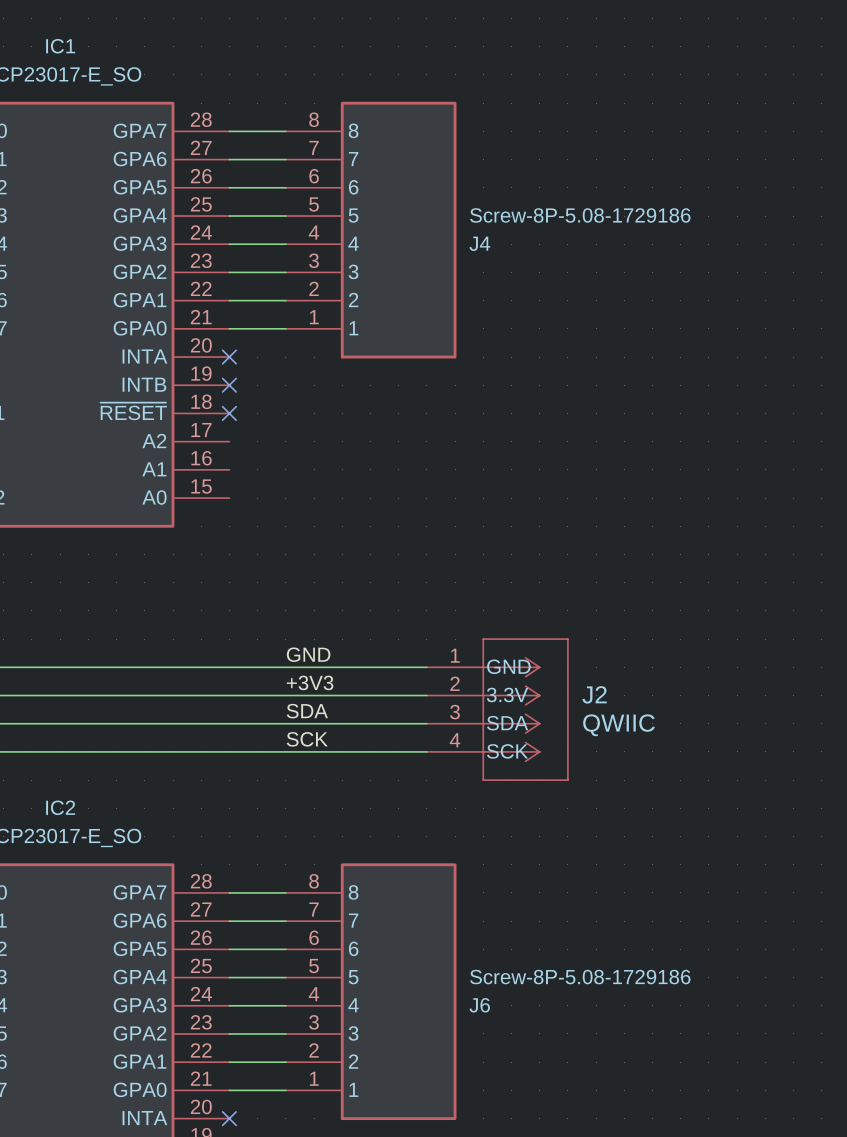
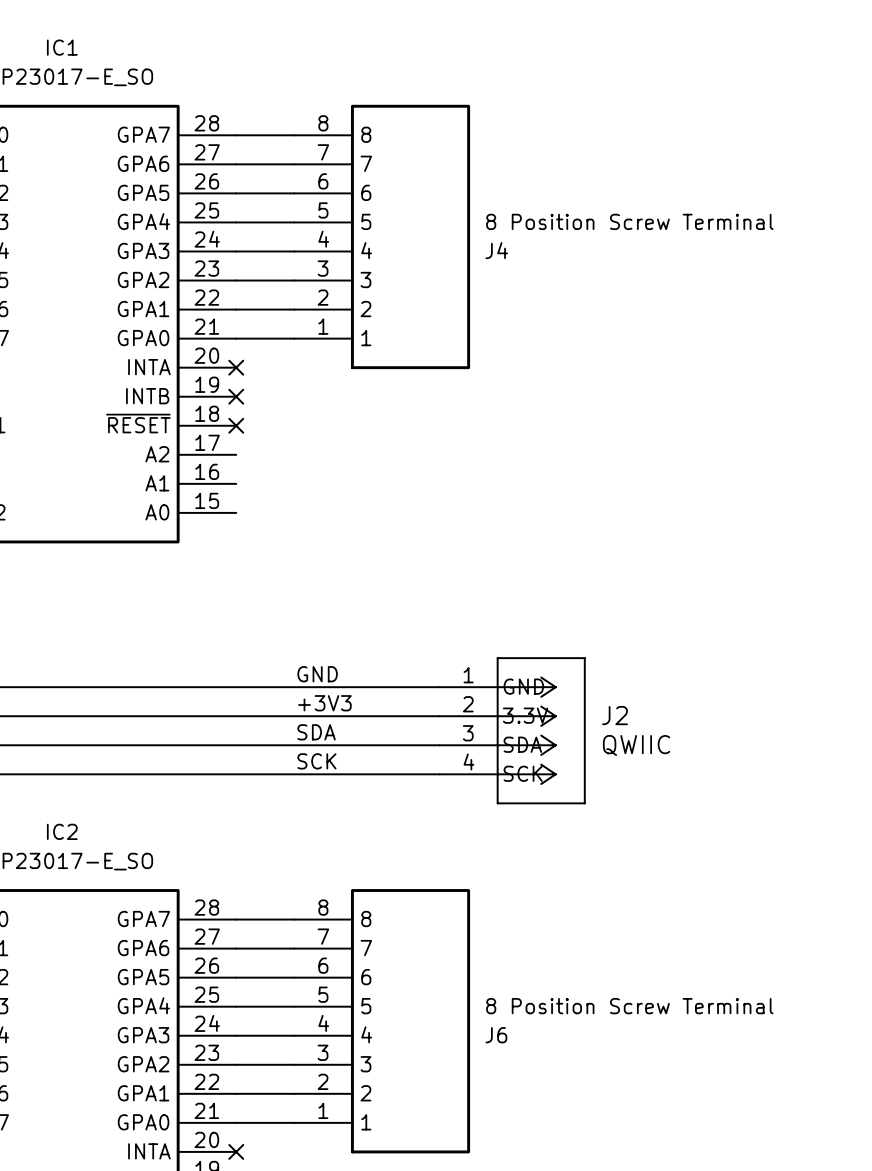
J4 value: Screw-8P-5.08-1729186 (580, 215) -> 8 Position Screw Terminal (629, 221)
J6 value: Screw-8P-5.08-1729186 (580, 977) -> 8 Position Screw Terminal (629, 1006)

